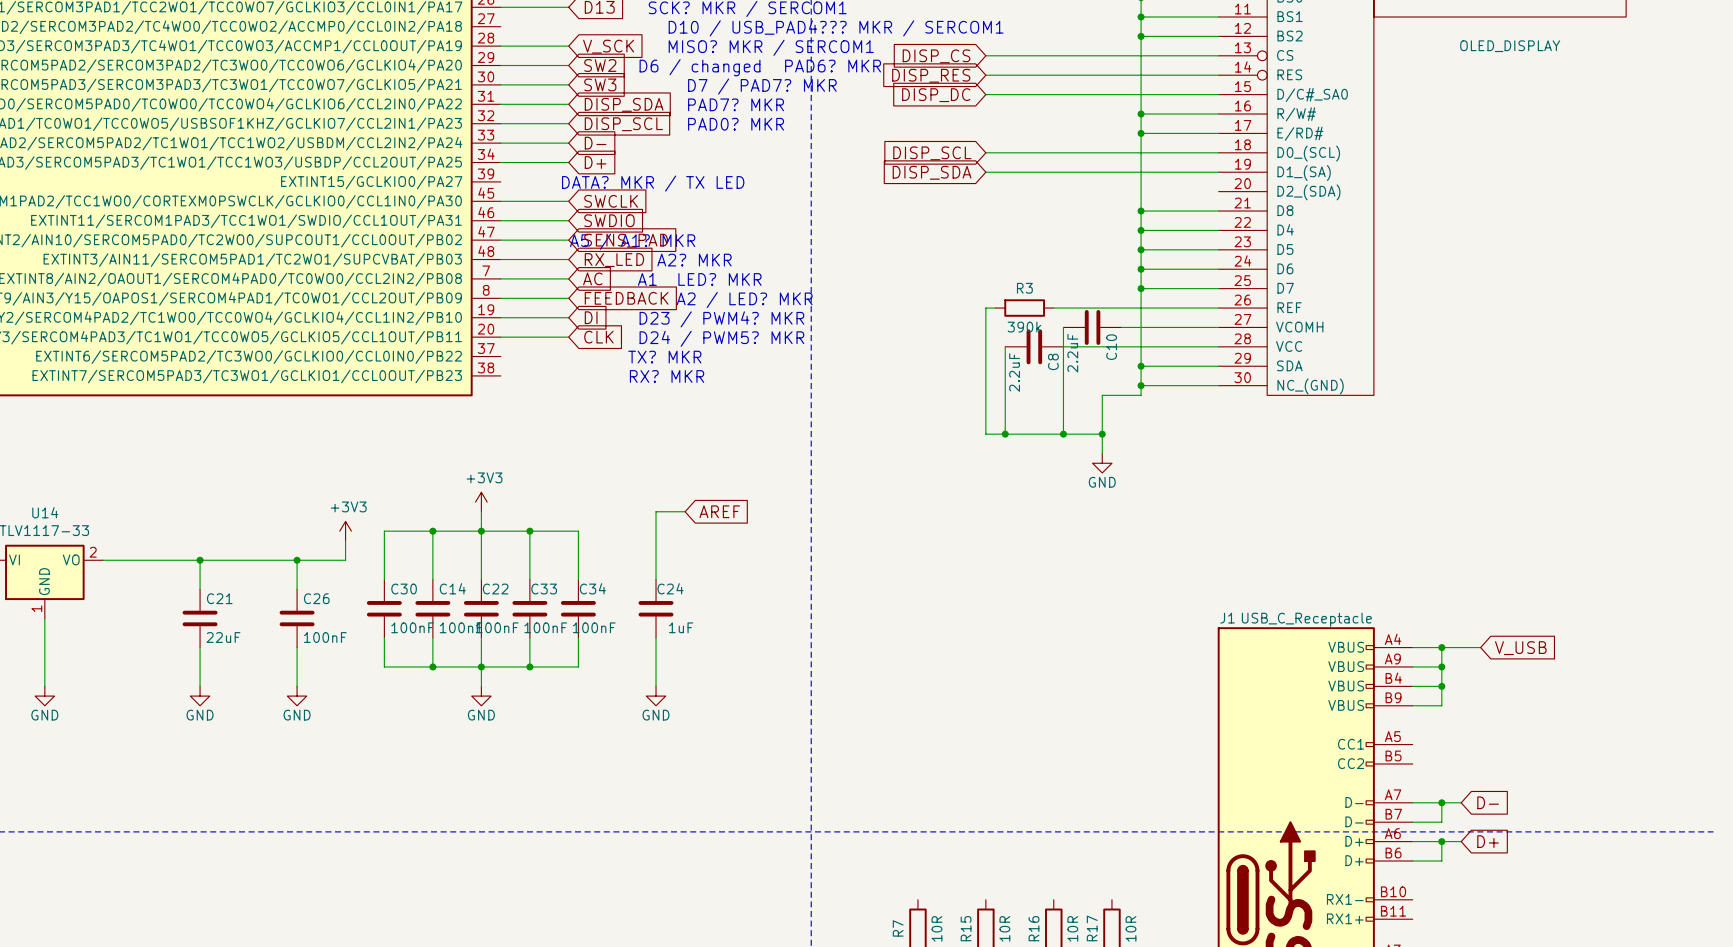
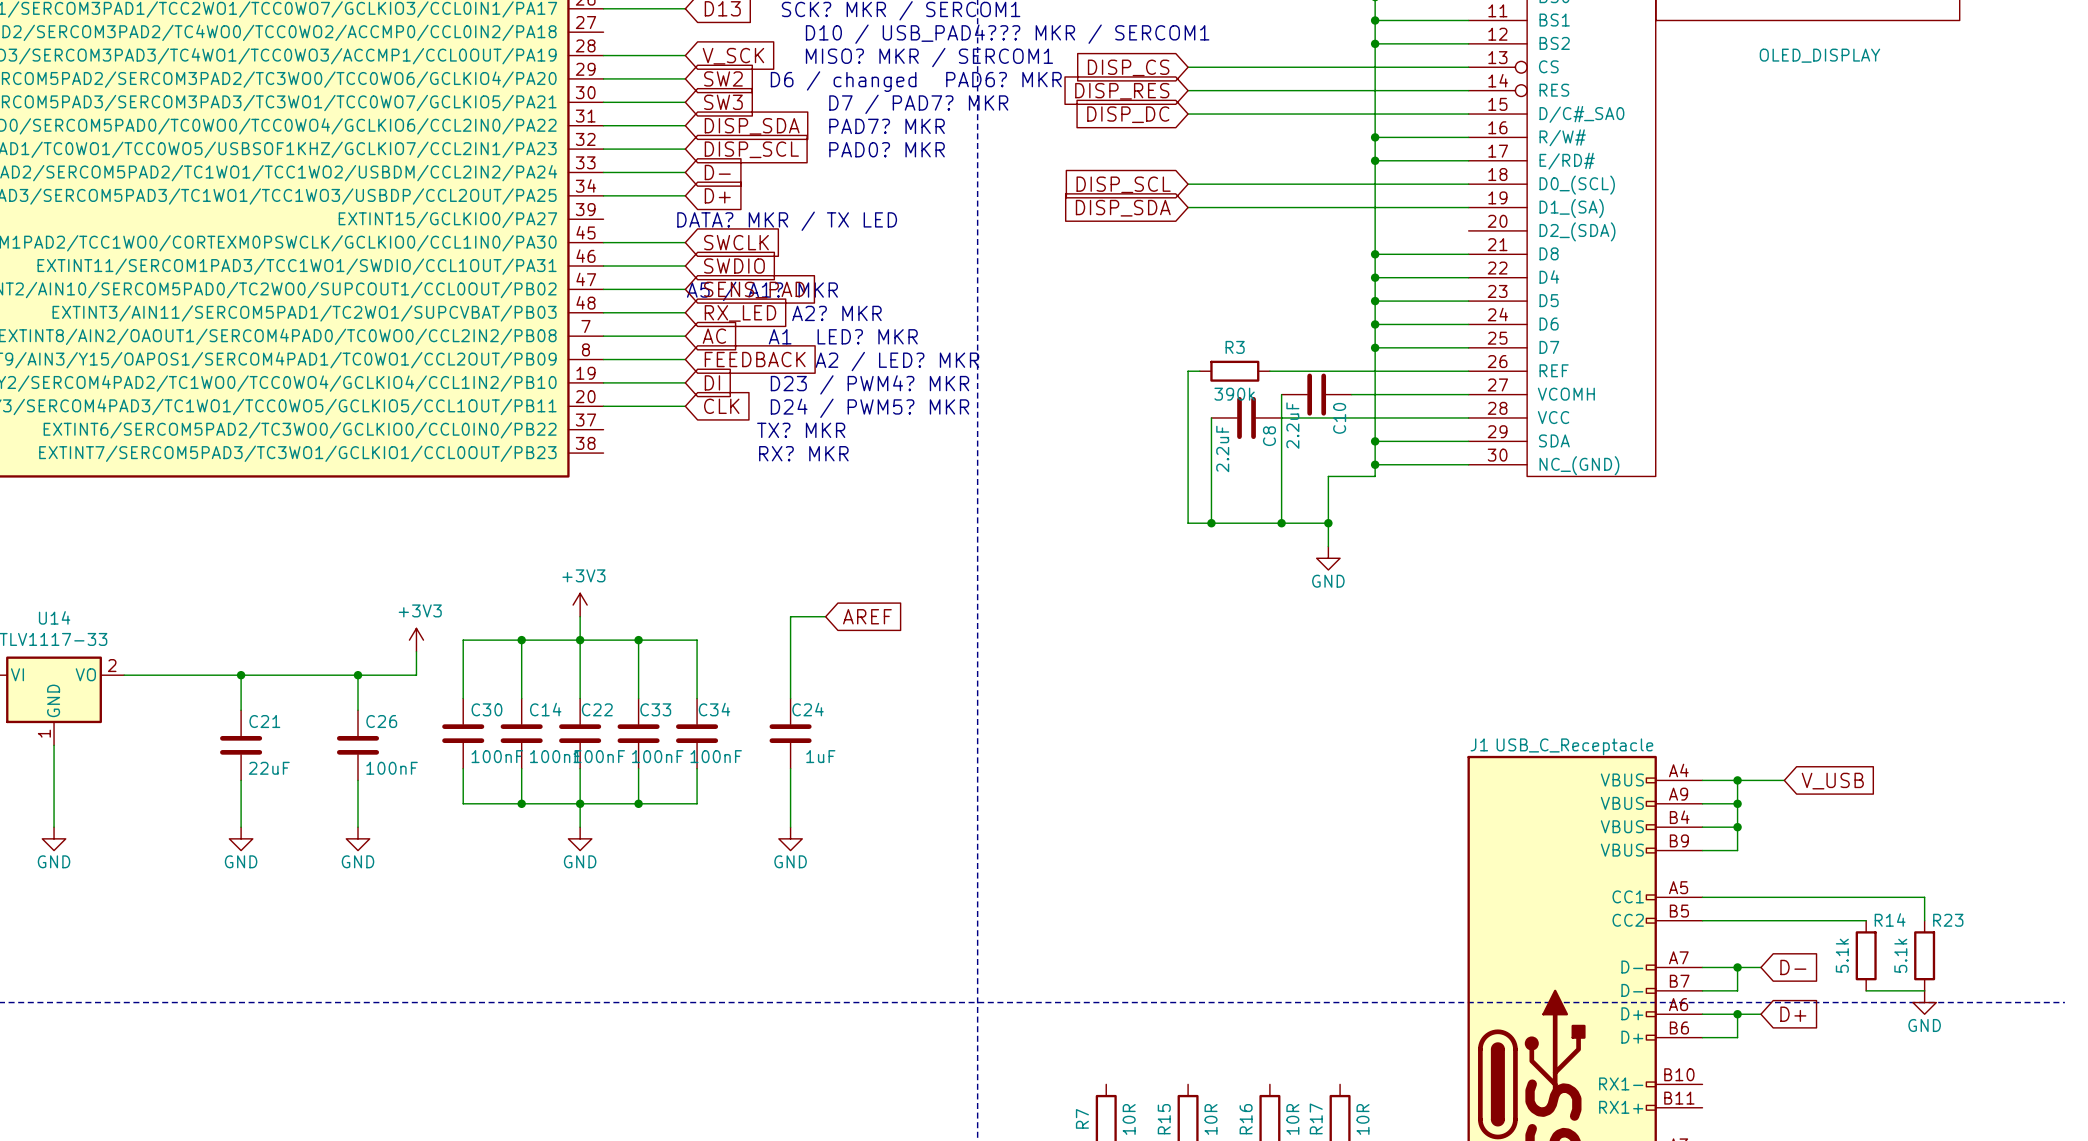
wire: none -> (1702, 897) (1924, 897) (1924, 920)
wire: none -> (1702, 920) (1866, 920)
R14: none -> 5.1k (1866, 955)
R23: none -> 5.1k (1924, 955)
wire: none -> (1866, 990) (1924, 990)
power symbol: none -> GND (1924, 1002)

